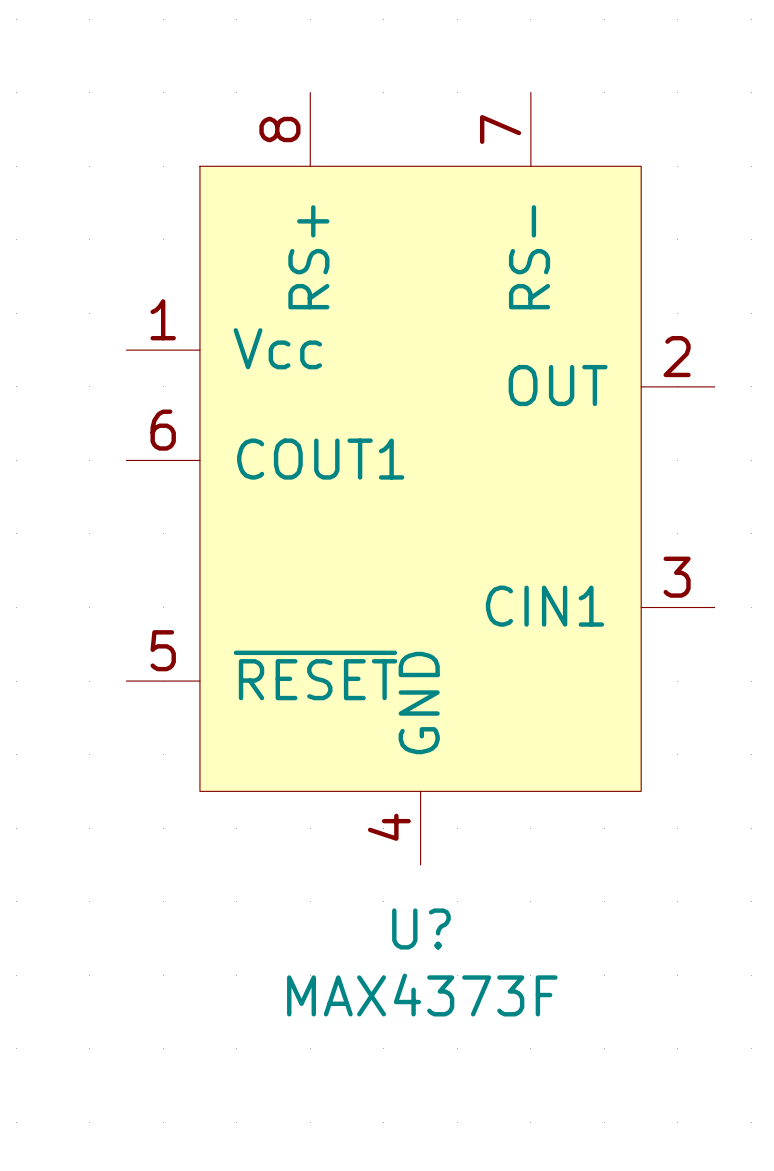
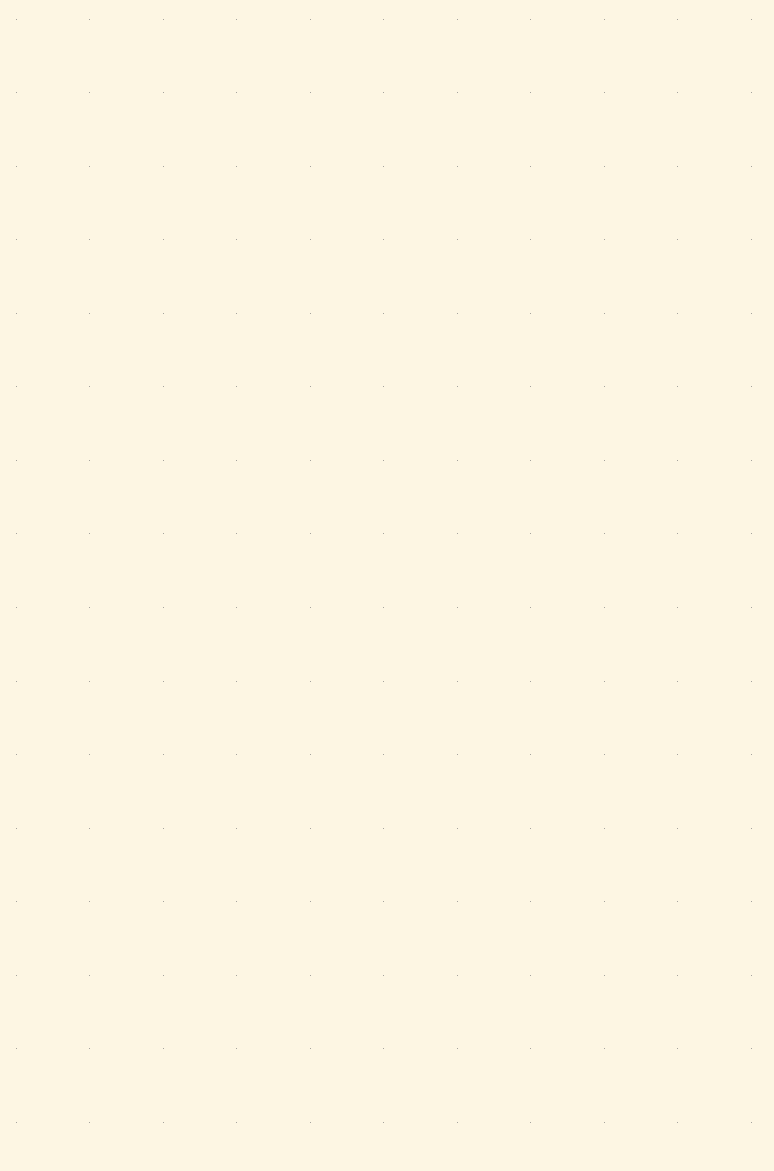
U?: MAX4373F (420, 478) -> none

